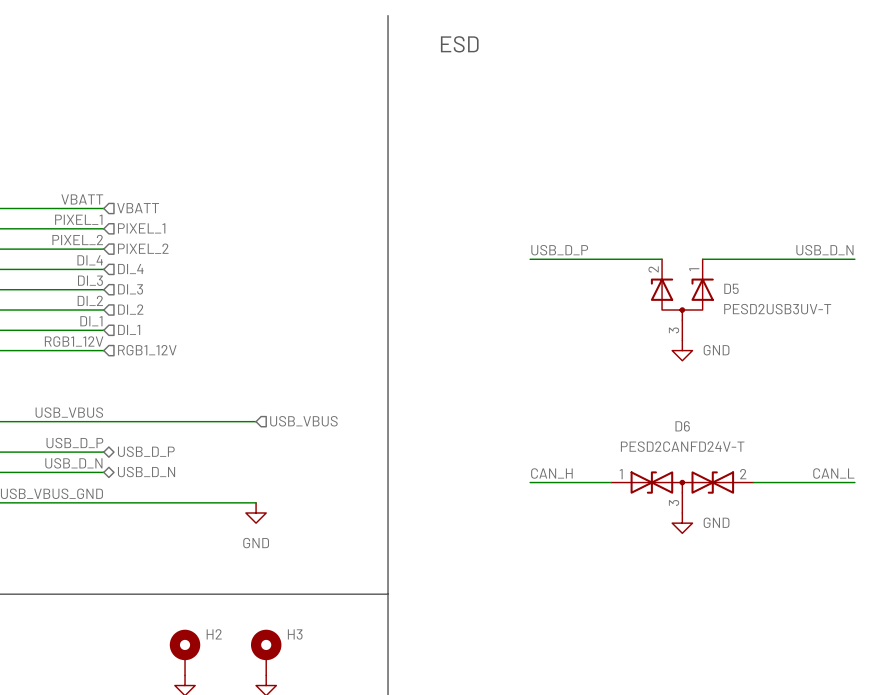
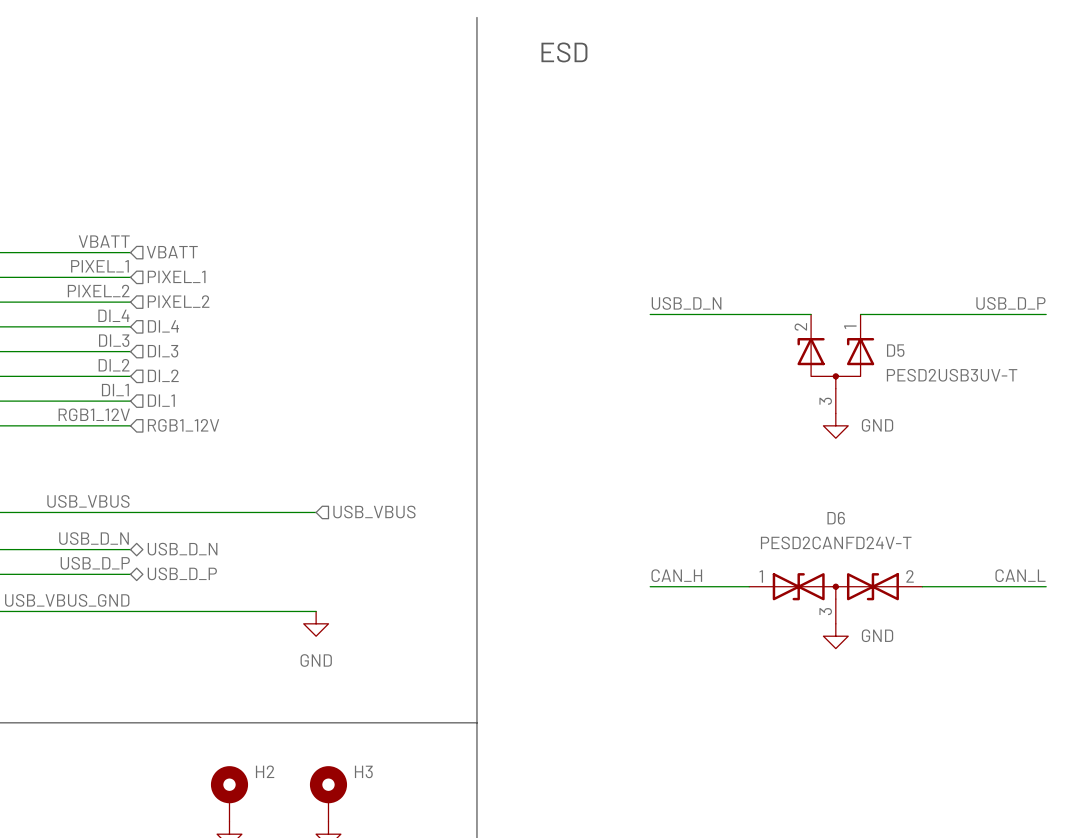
label: USB_D_P (559, 250) -> USB_D_N (686, 303)
label: USB_D_N (824, 250) -> USB_D_P (1010, 303)
label: USB_D_P (74, 443) -> USB_D_N (94, 538)
hierarchical label: USB_D_P (146, 451) -> USB_D_N (182, 549)
label: USB_D_N (73, 463) -> USB_D_P (95, 563)
hierarchical label: USB_D_N (146, 472) -> USB_D_P (182, 573)

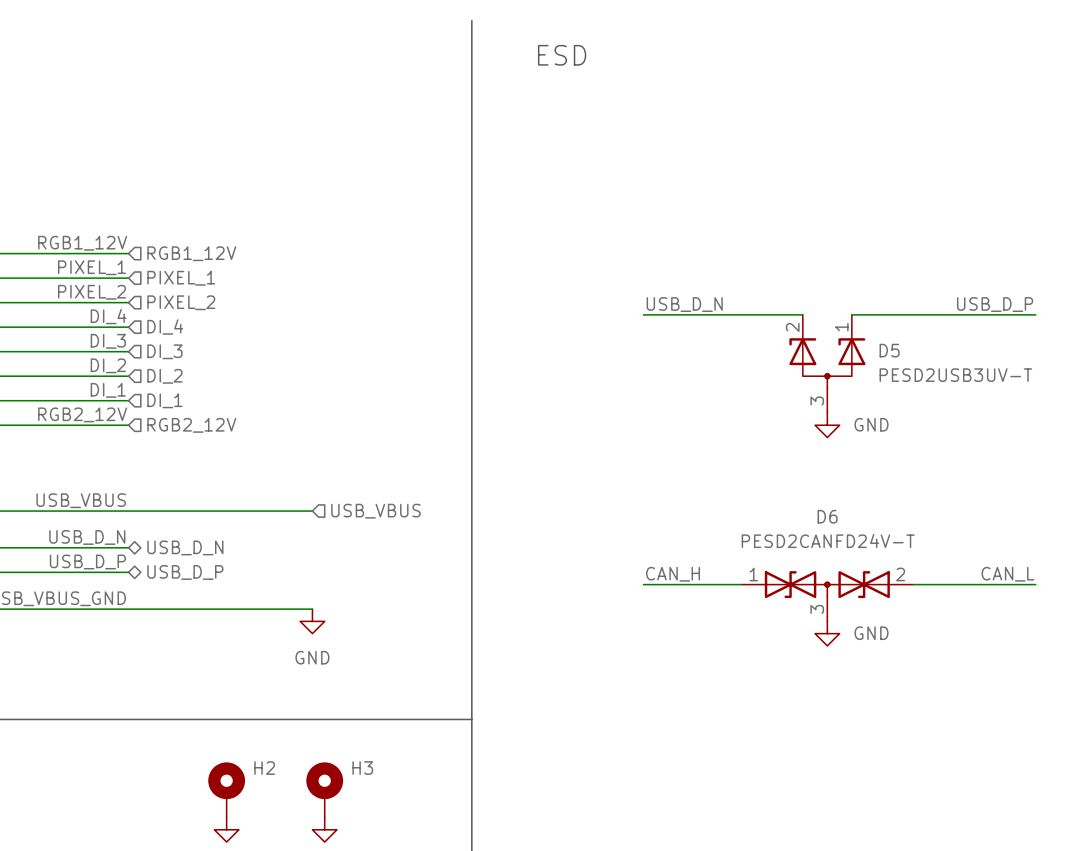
label: VBATT (104, 241) -> RGB1_12V (82, 243)
hierarchical label: VBATT (172, 252) -> RGB1_12V (191, 253)
label: RGB1_12V (94, 414) -> RGB2_12V (82, 414)
hierarchical label: RGB1_12V (183, 425) -> RGB2_12V (191, 425)

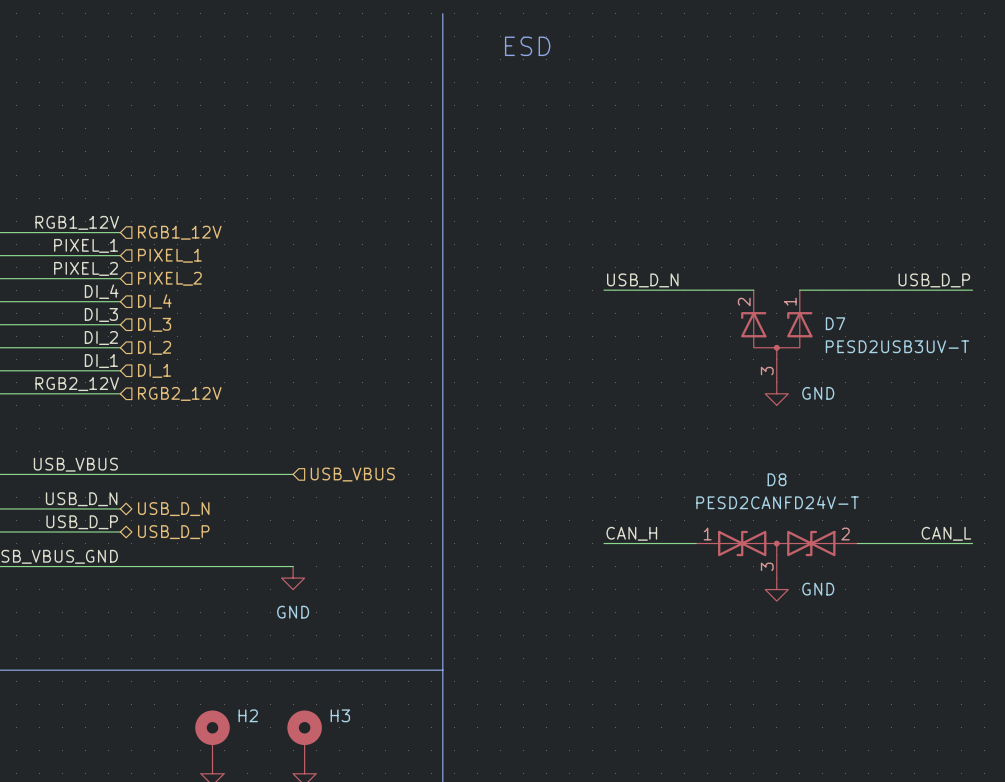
D5 name: D5 (889, 350) -> D7 (835, 323)
D6 name: D6 (827, 516) -> D8 (777, 479)

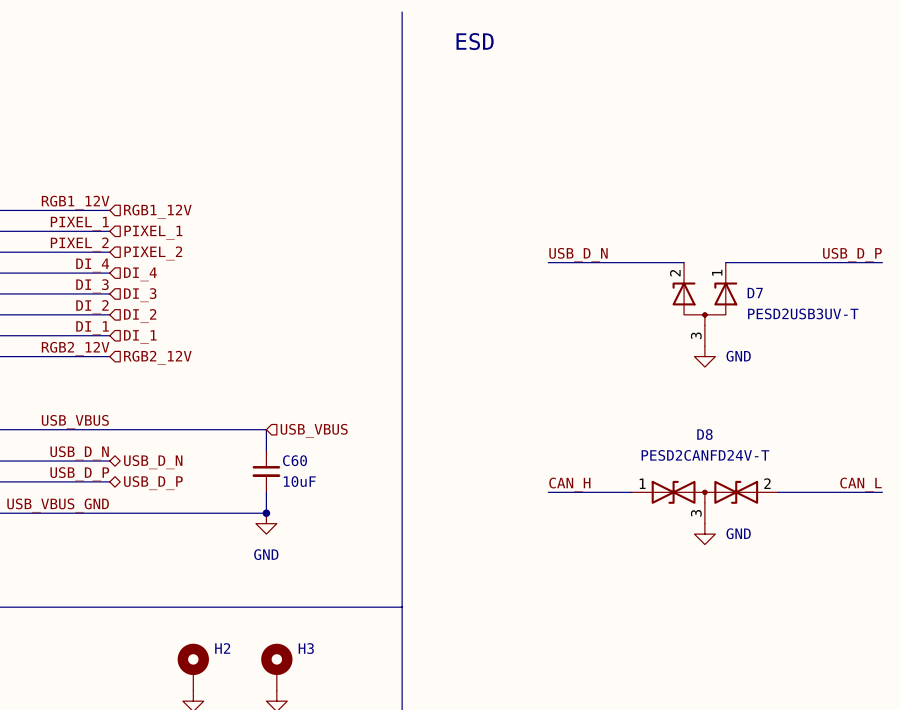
wire: none -> (266, 429) (266, 450)
C60: none -> 10uF (266, 471)
wire: none -> (266, 492) (266, 513)
junction: none -> (266, 513)

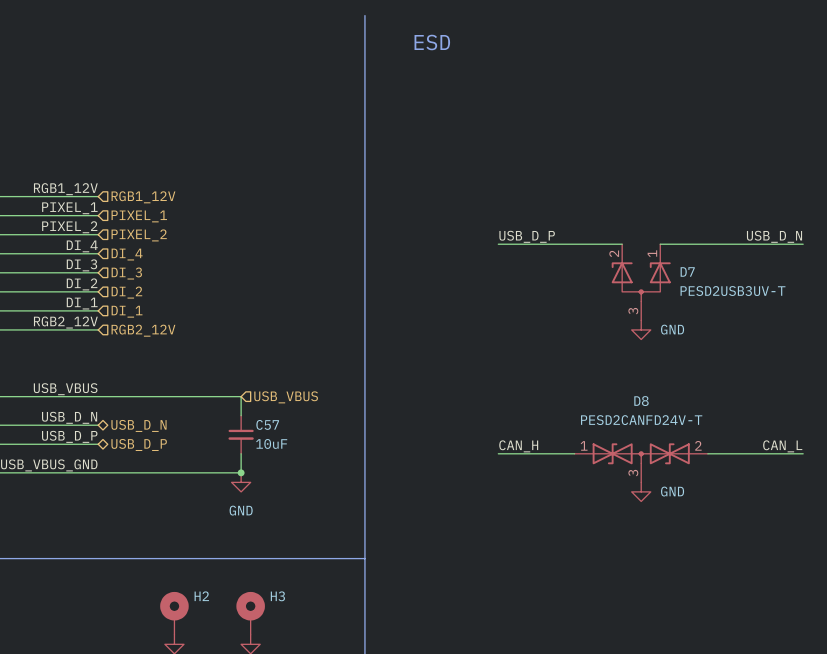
label: USB_D_N (578, 254) -> USB_D_P (527, 236)
label: USB_D_P (852, 254) -> USB_D_N (774, 236)
C60 name: C60 (295, 460) -> C57 (267, 424)

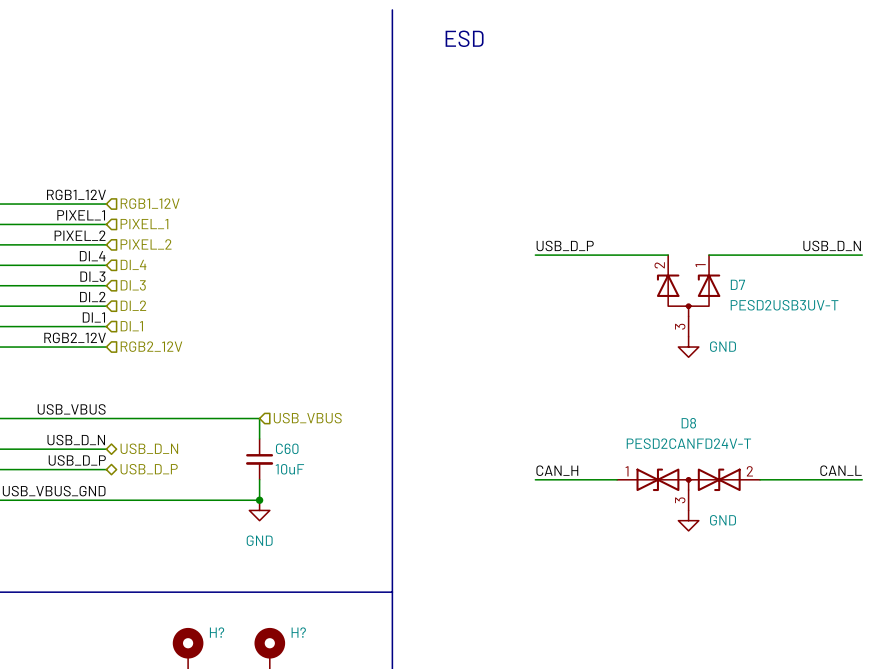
C57 name: C57 (267, 424) -> C60 (287, 448)
H2 name: H2 (201, 596) -> H? (217, 632)
H3 name: H3 (277, 596) -> H? (298, 632)

